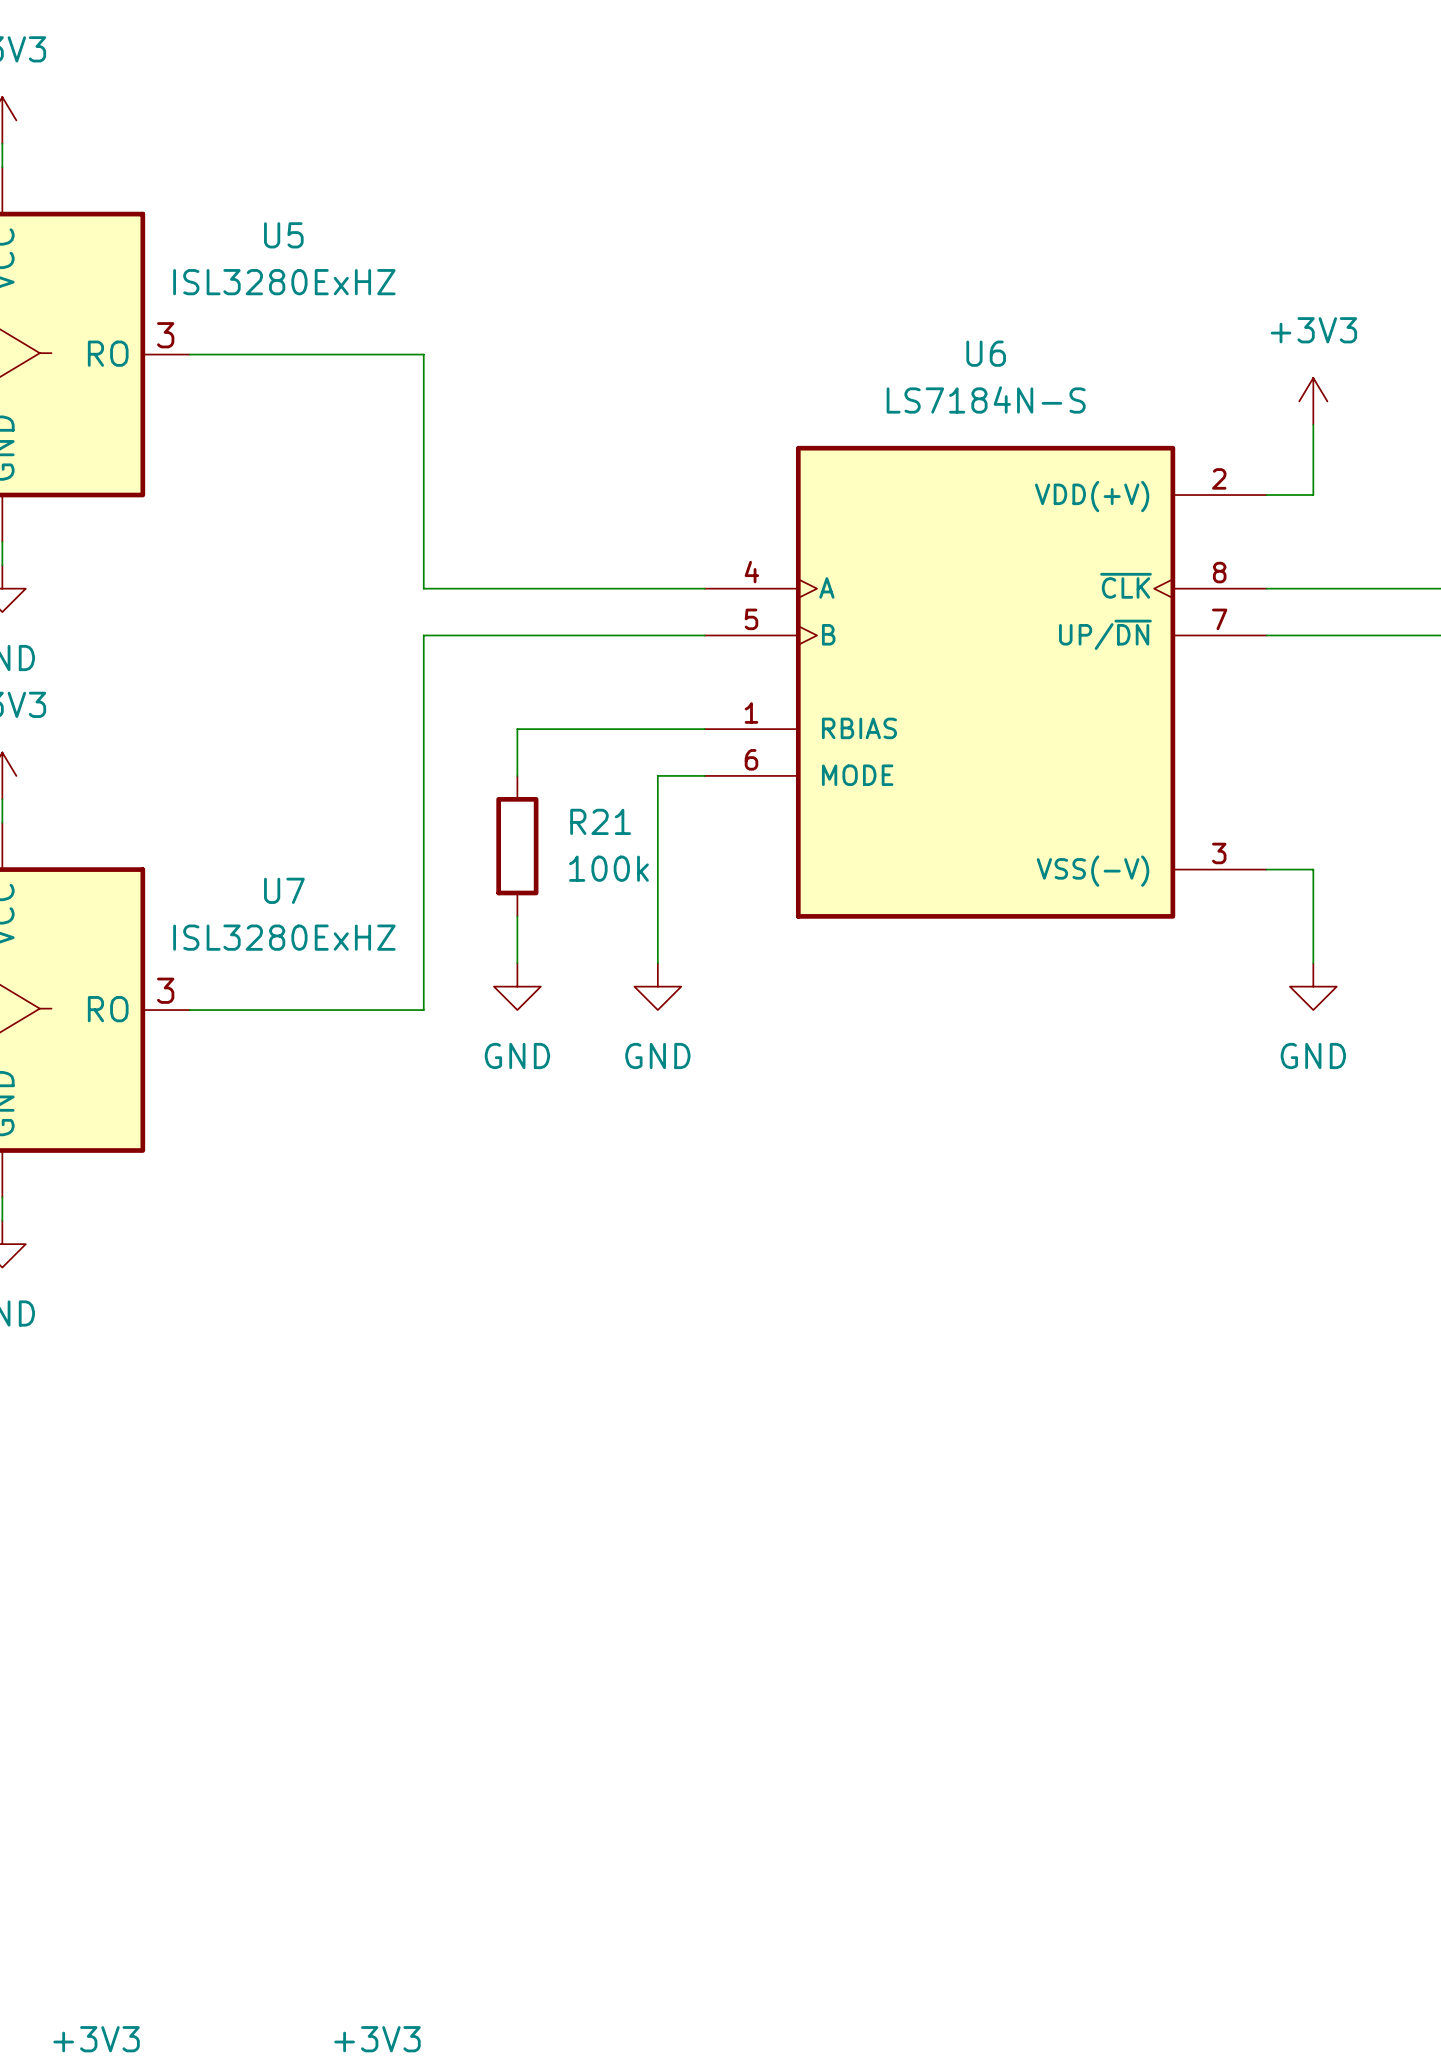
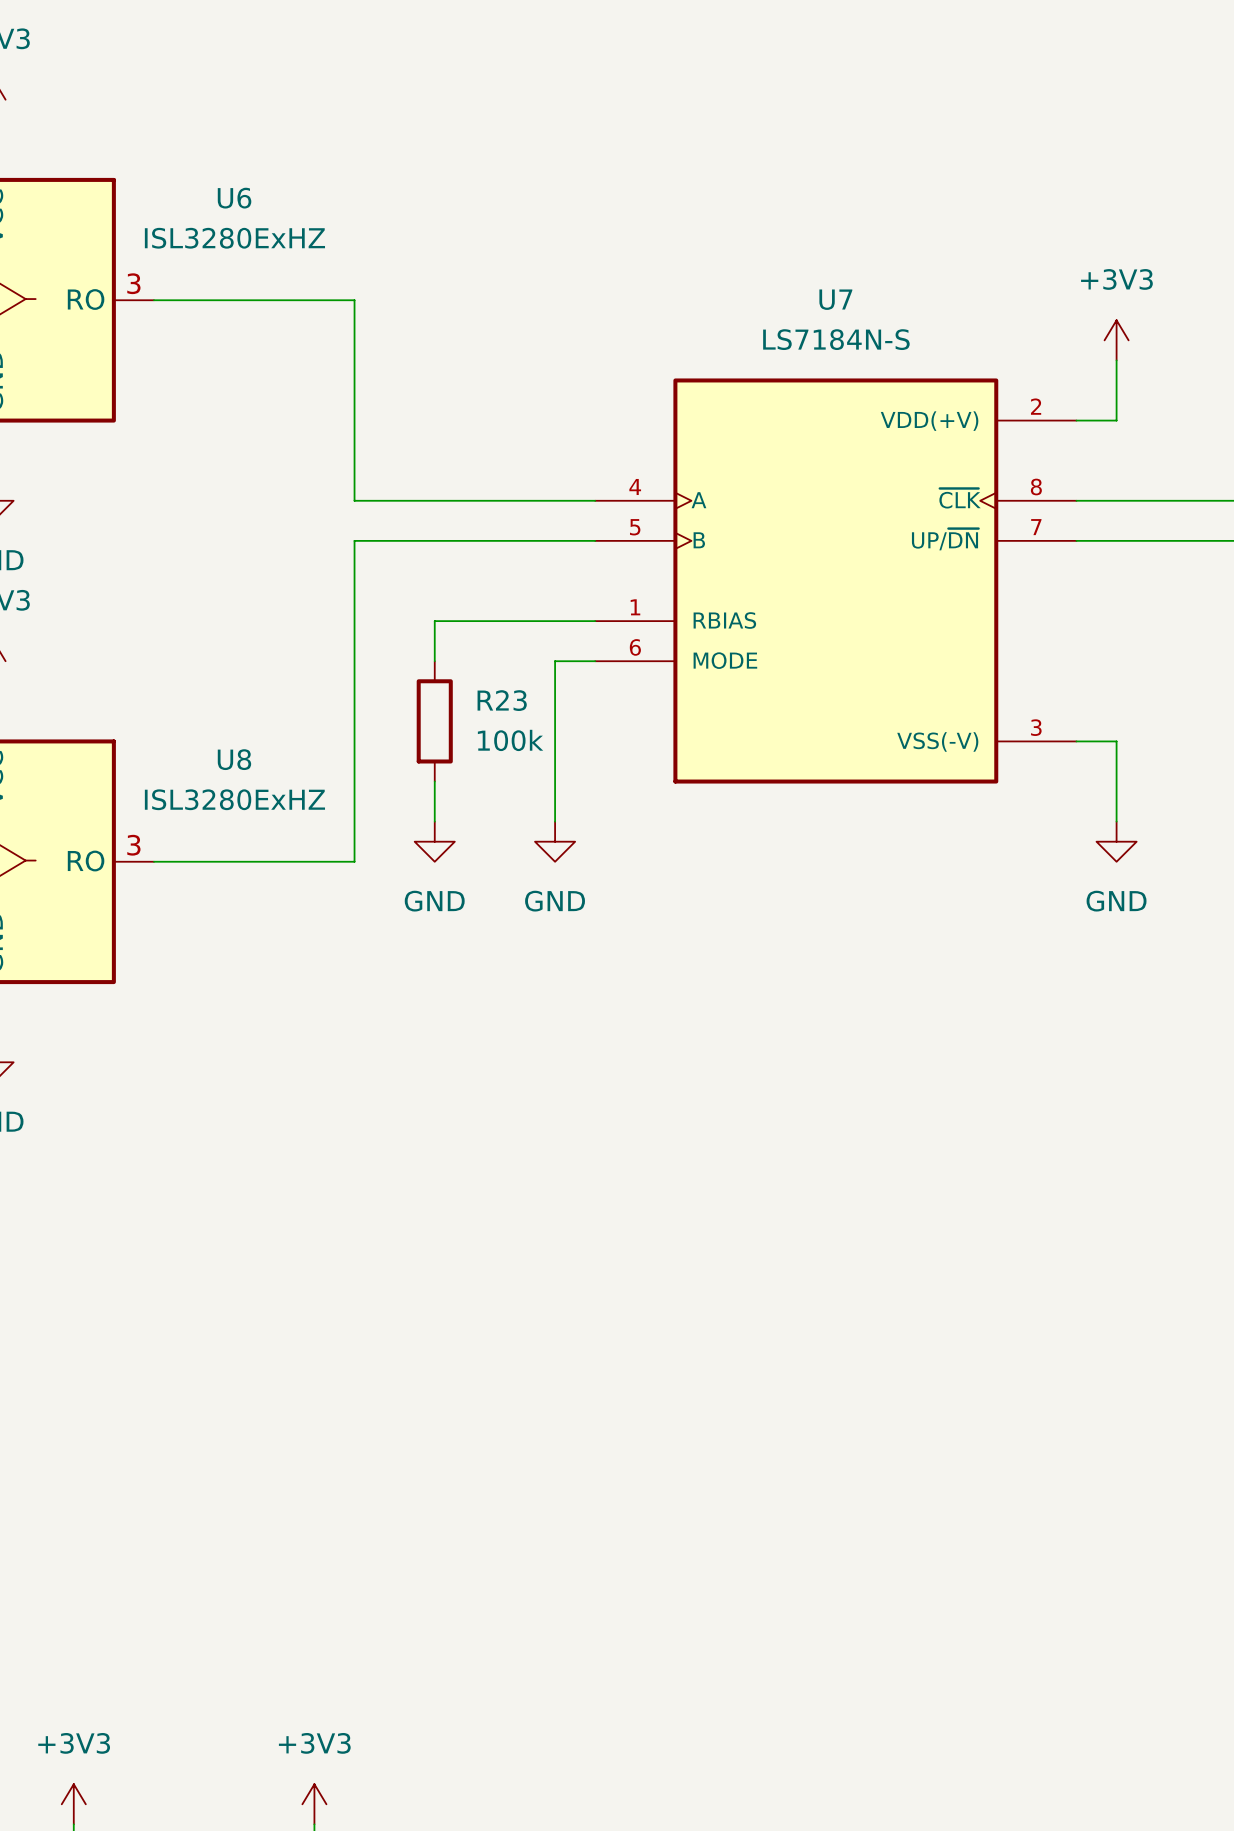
U5 name: U5 (283, 235) -> U6 (234, 198)
U6 name: U6 (986, 353) -> U7 (835, 299)
R21 name: R21 (600, 821) -> R23 (502, 700)
U7 name: U7 (284, 890) -> U8 (234, 759)

